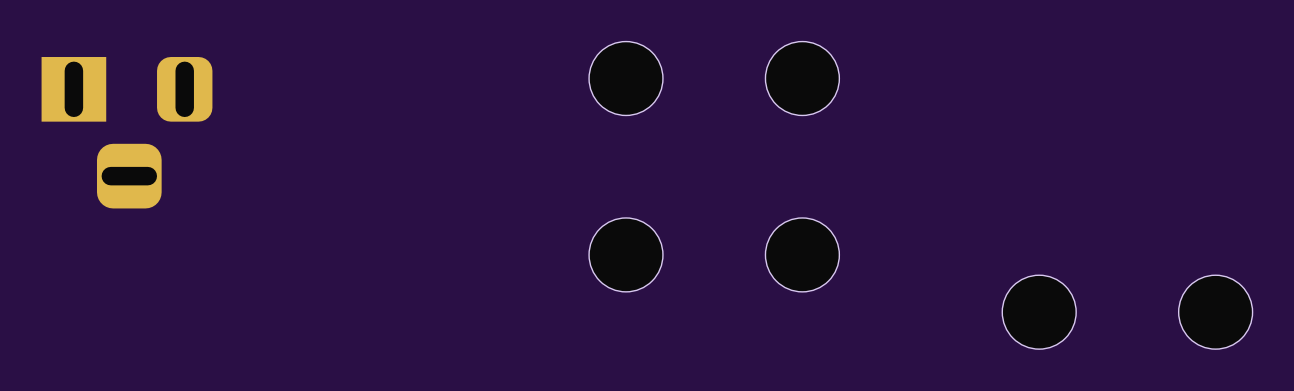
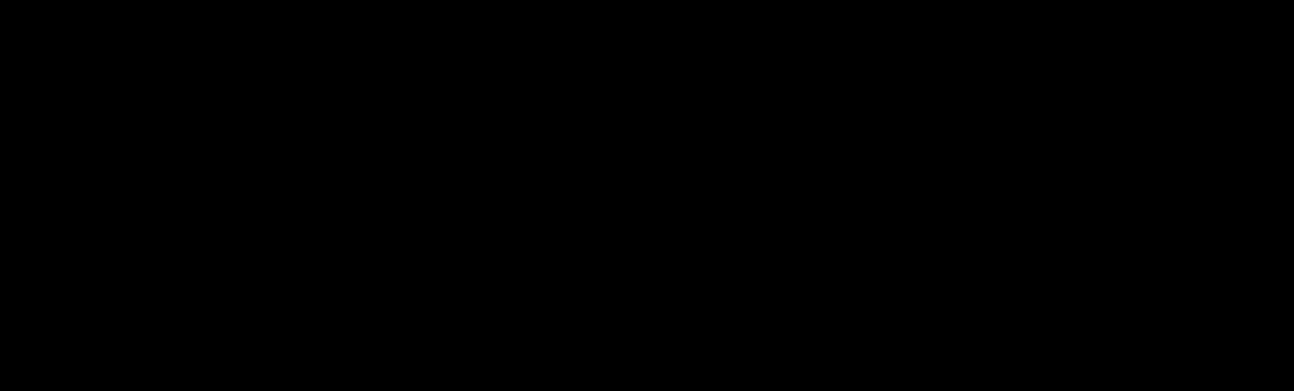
part: (626, 78) -> none
part: (802, 78) -> none
part: (127, 132) -> none
part: (626, 254) -> none
part: (802, 254) -> none
part: (1039, 312) -> none
part: (1215, 312) -> none

